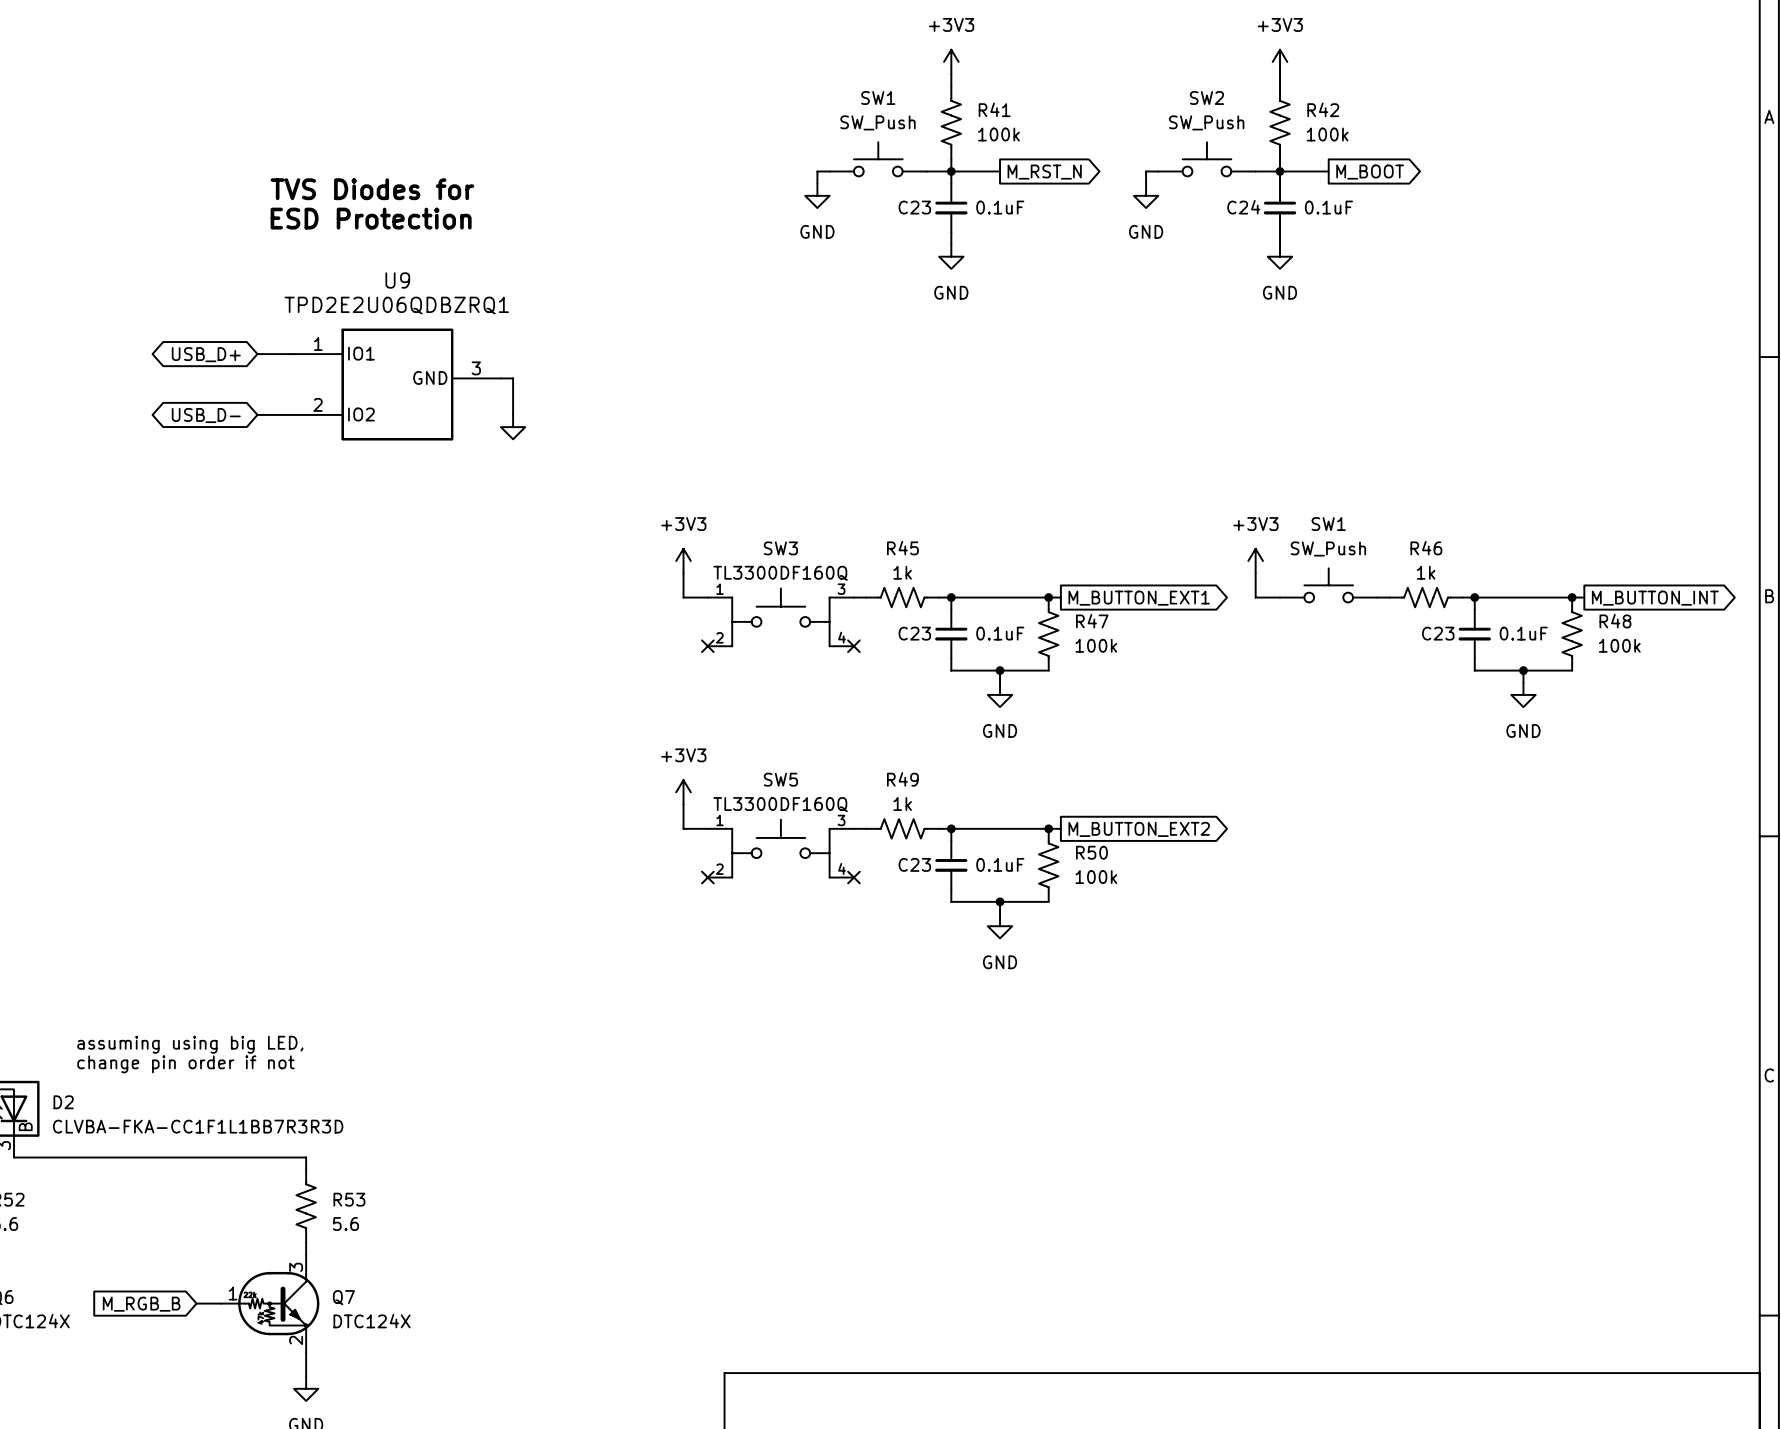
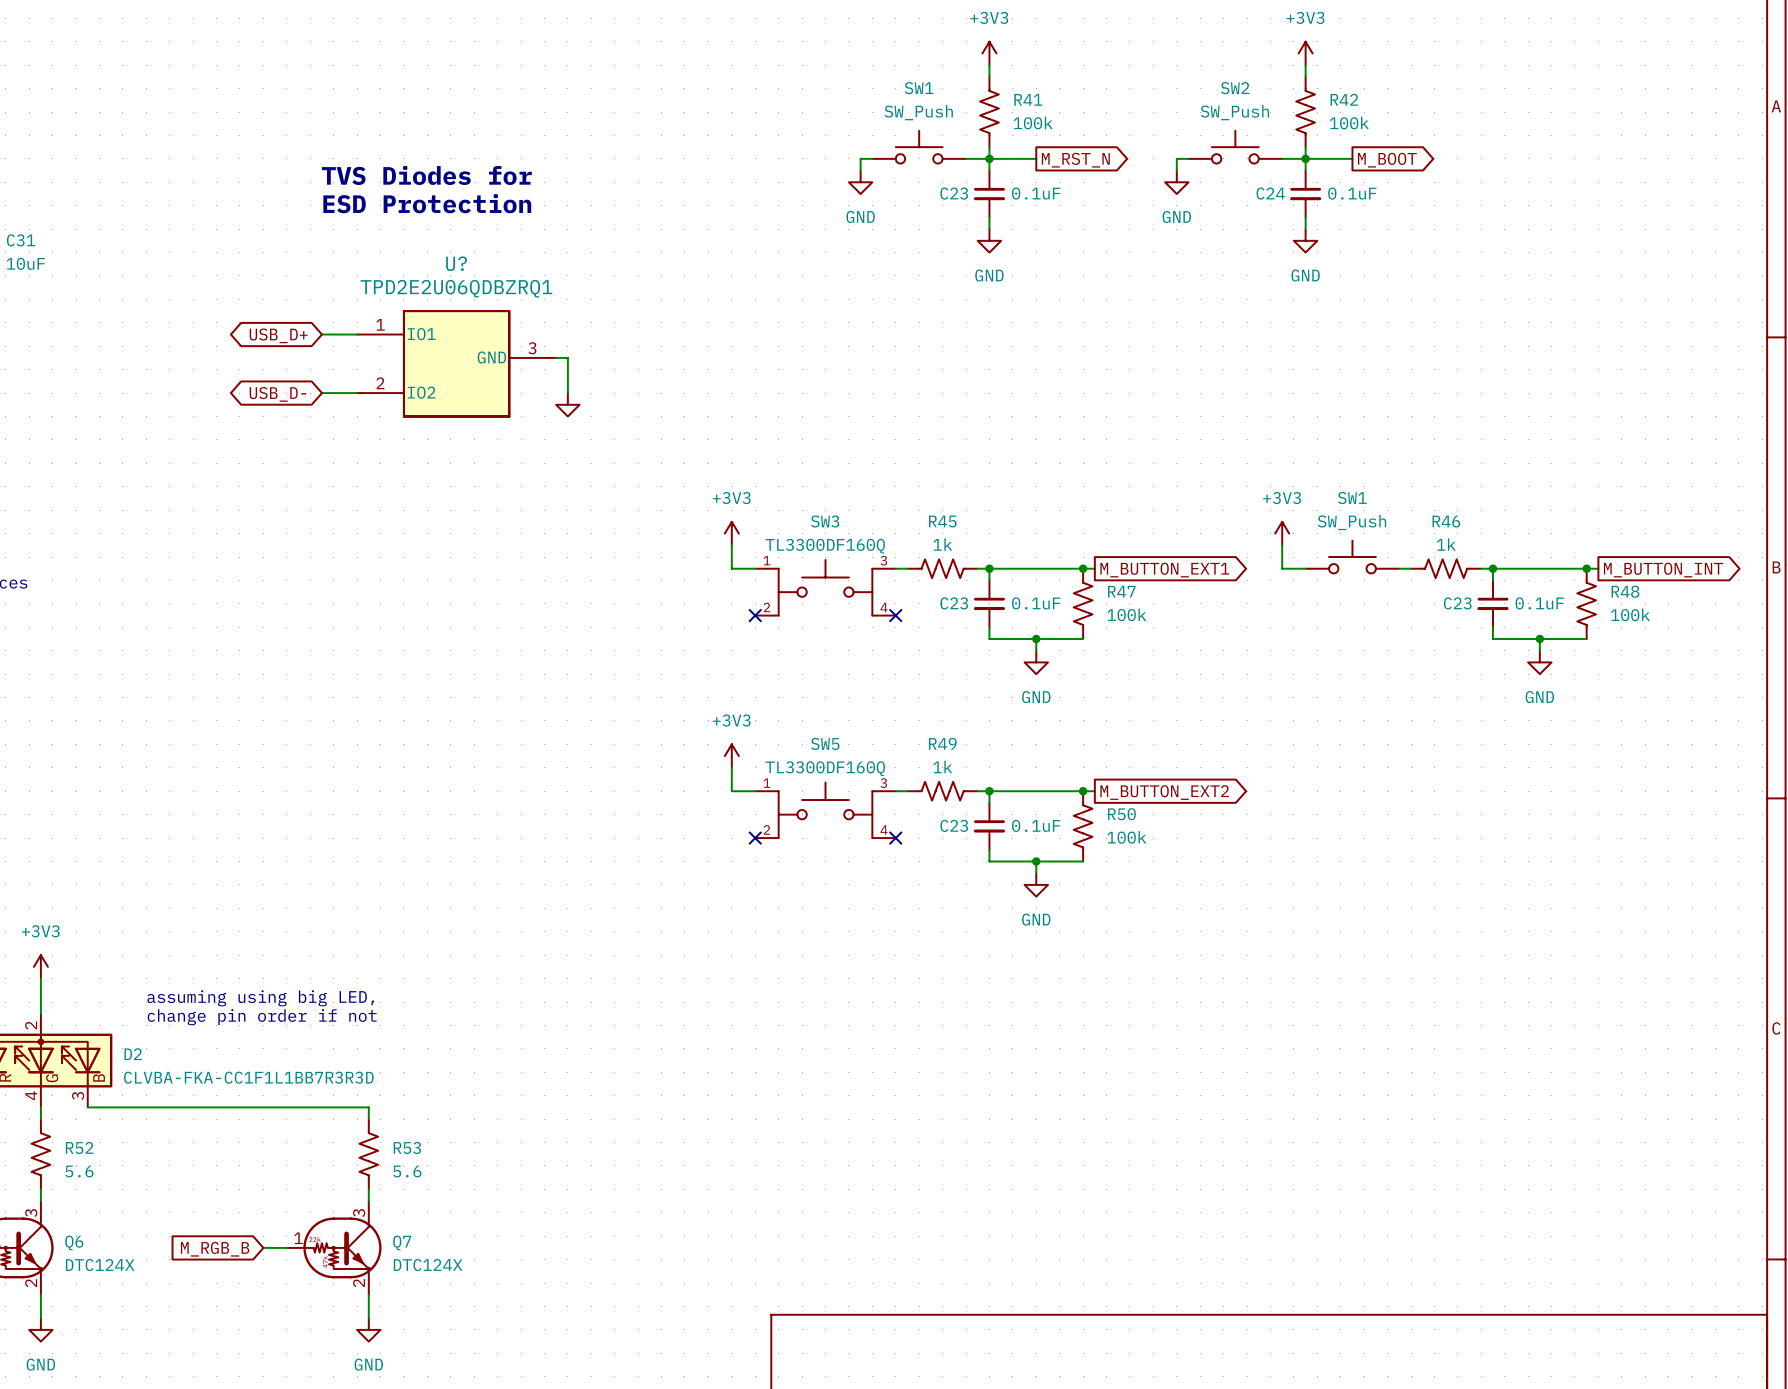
U9 name: U9 (397, 280) -> U? (456, 263)

